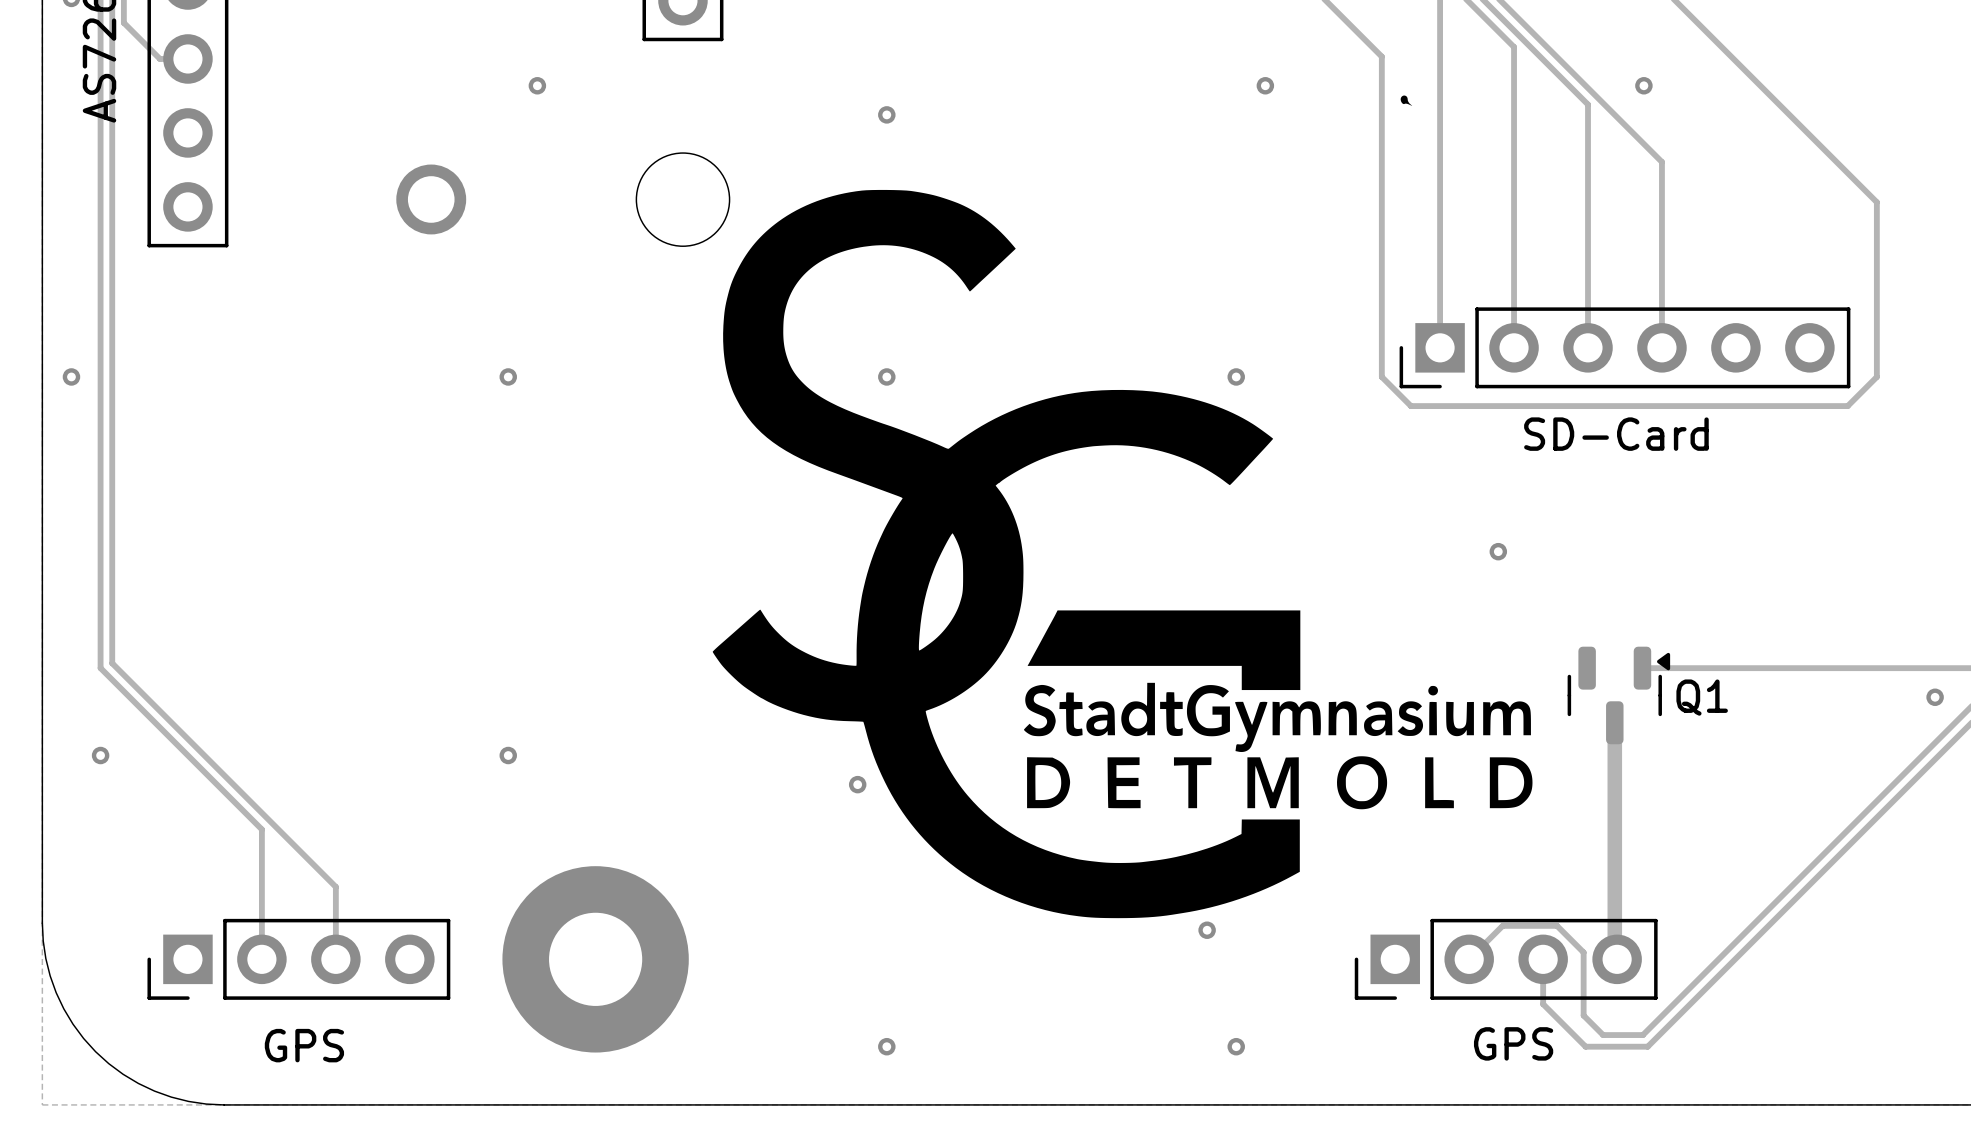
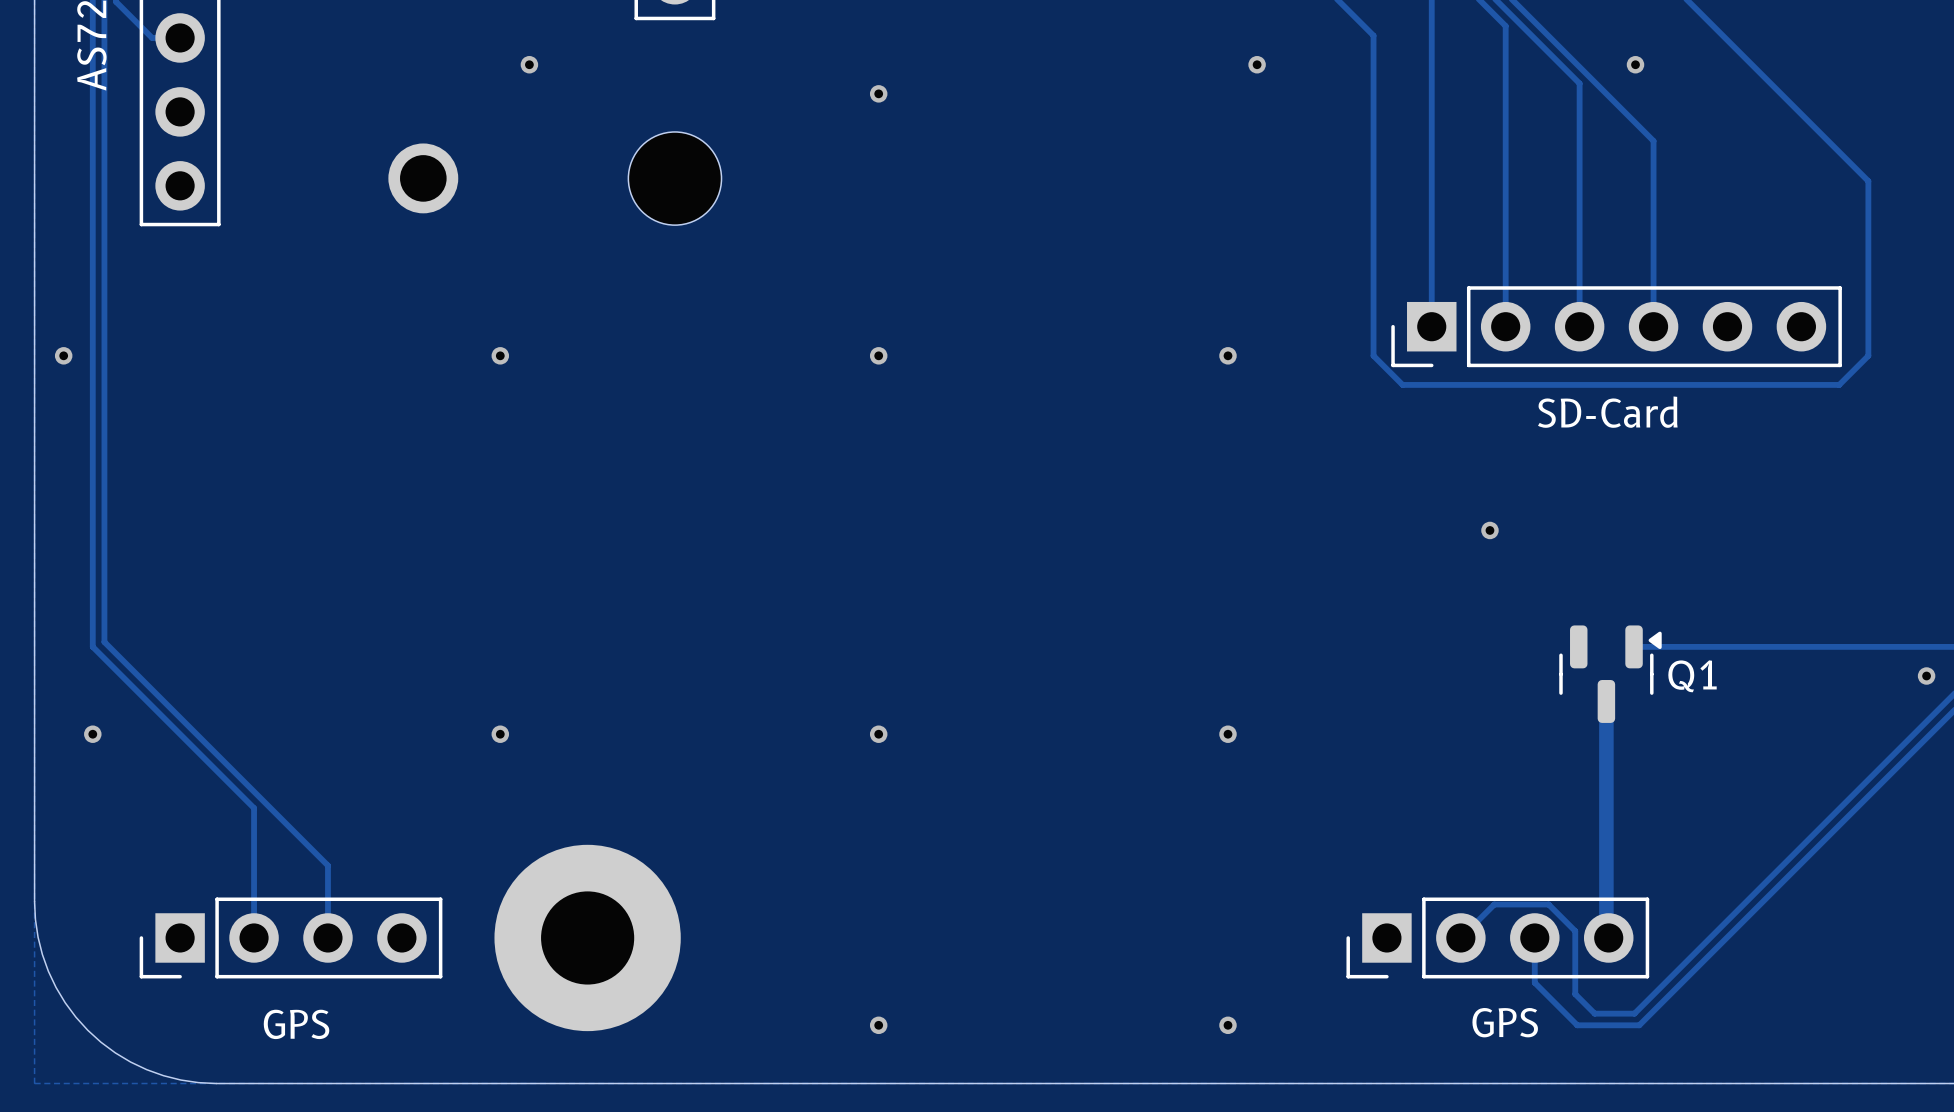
drawing: [1400, 95, 1413, 106] -> none
drawing: [712, 189, 1533, 919] -> none
via: none -> (1227, 734)
via position: (857, 784) -> (878, 734)
via: (1207, 930) -> none

